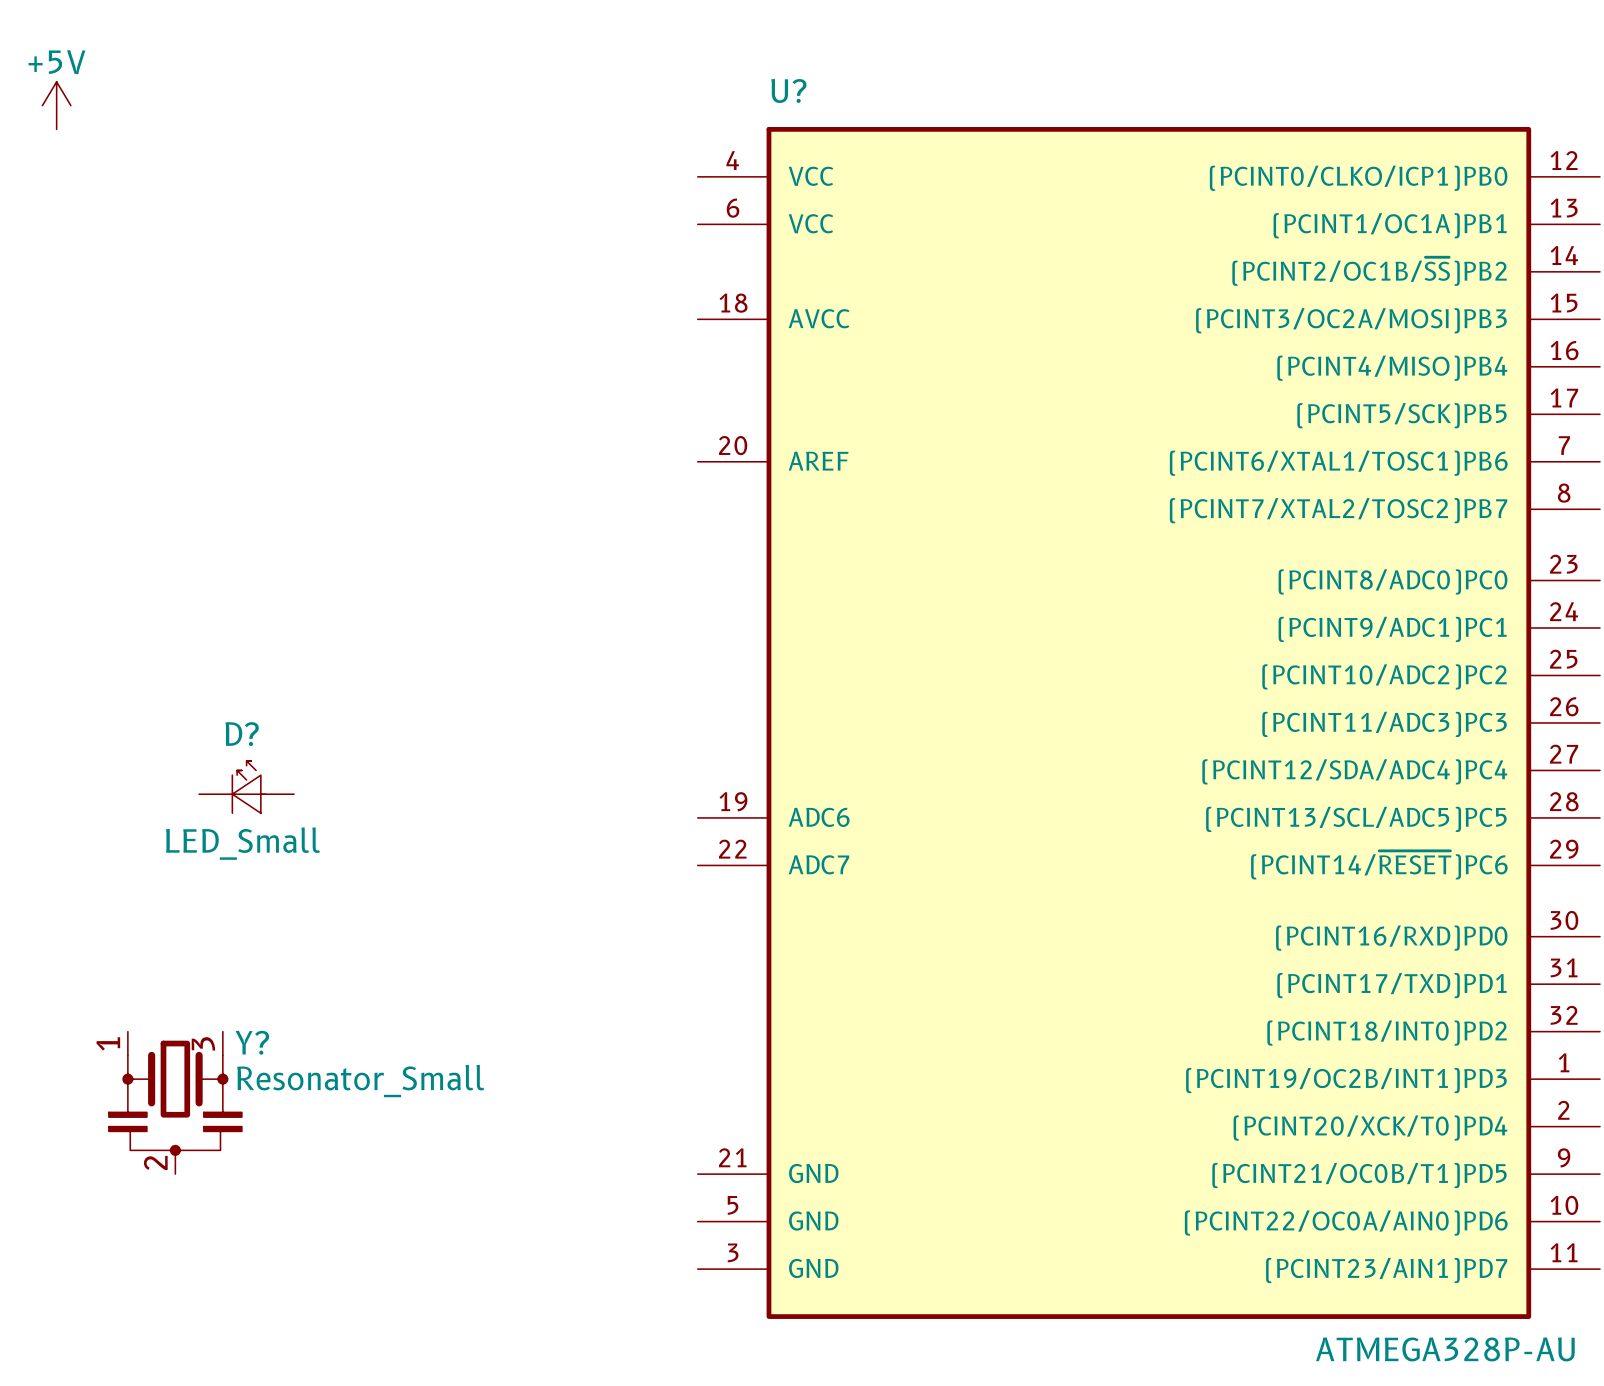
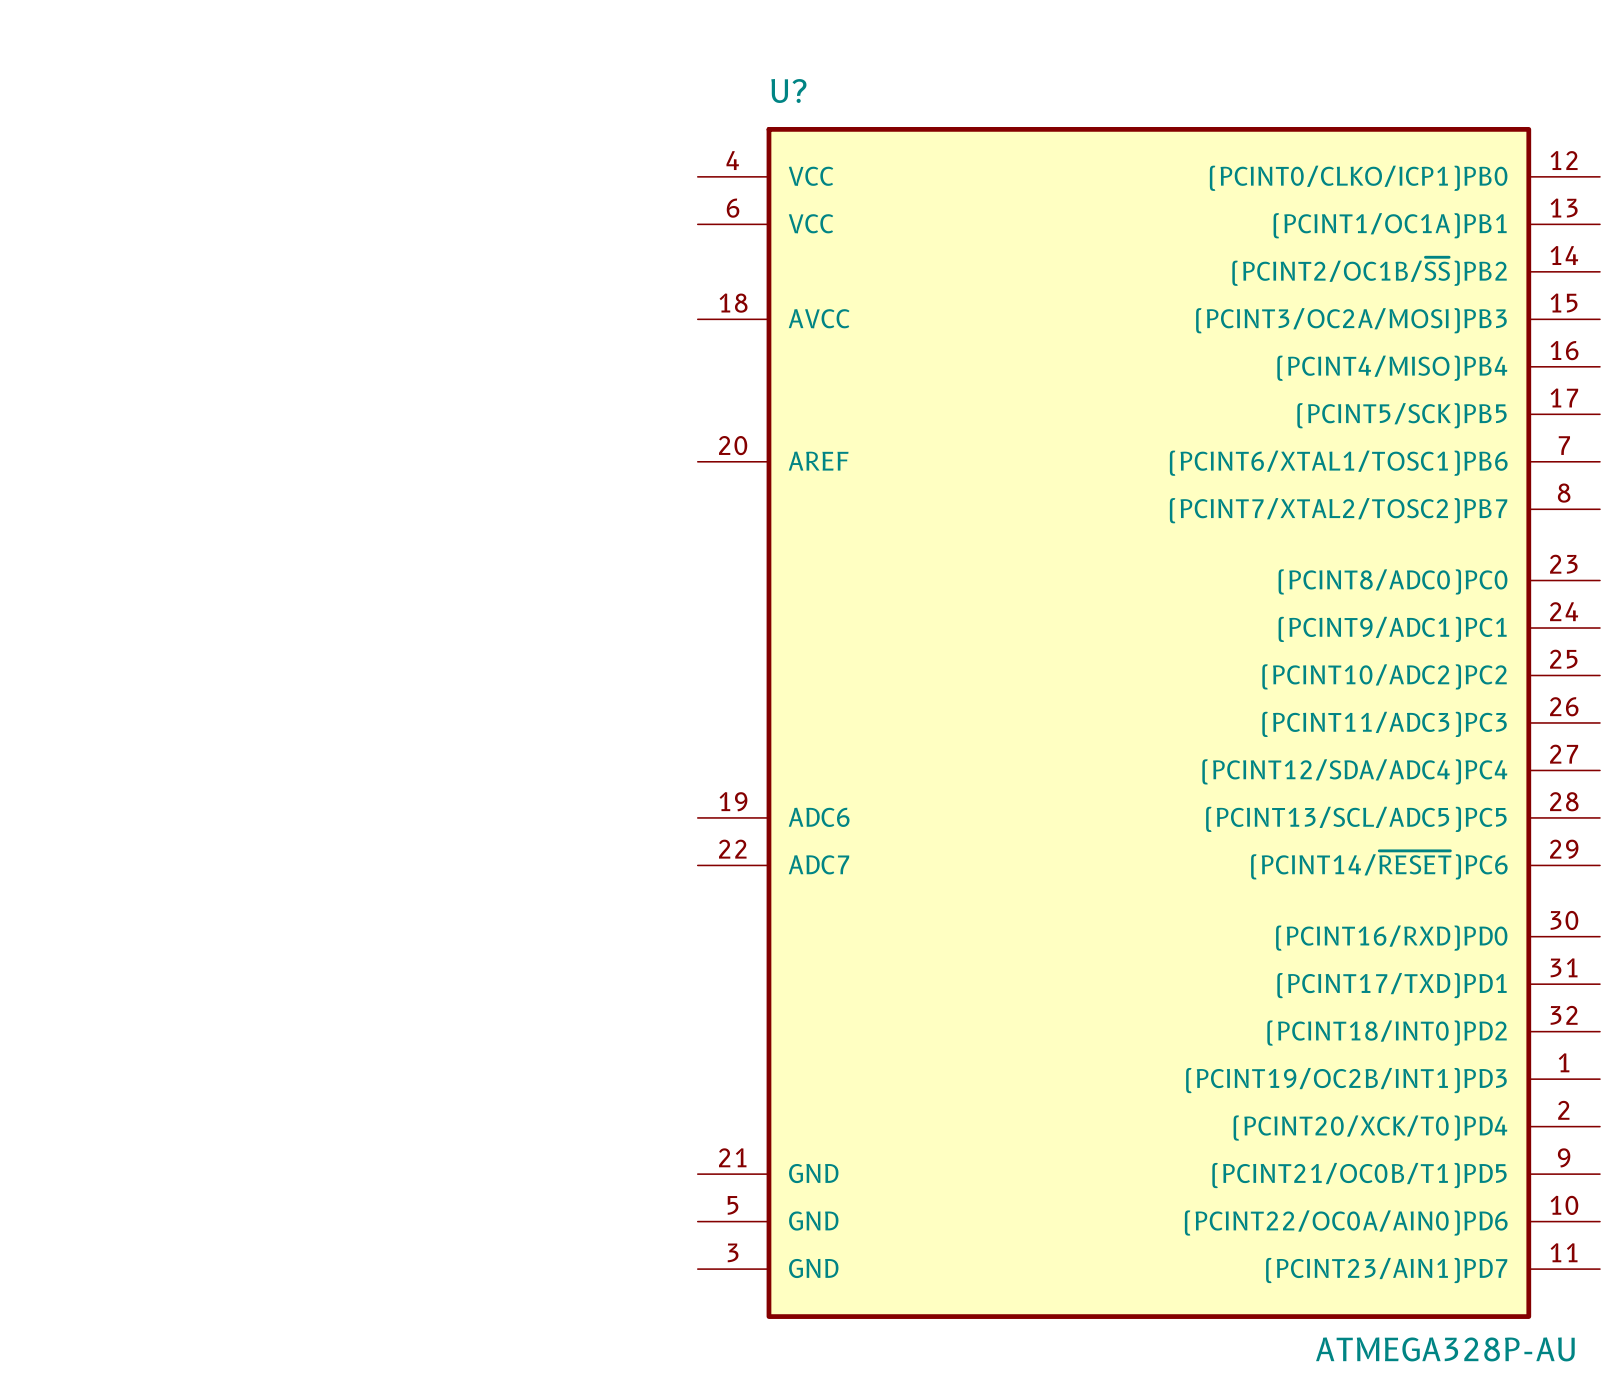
power symbol: +5V (56, 105) -> none
D?: LED_Small (246, 787) -> none
Y?: Resonator_Small (175, 1102) -> none

